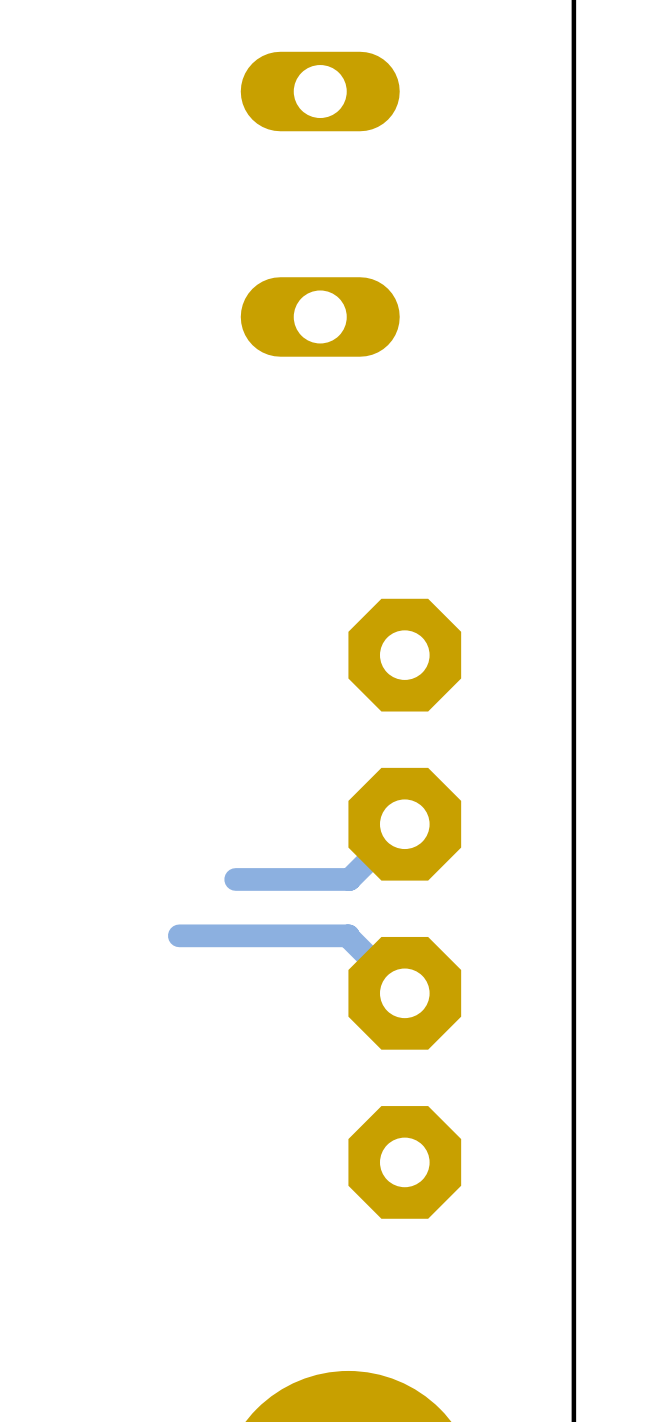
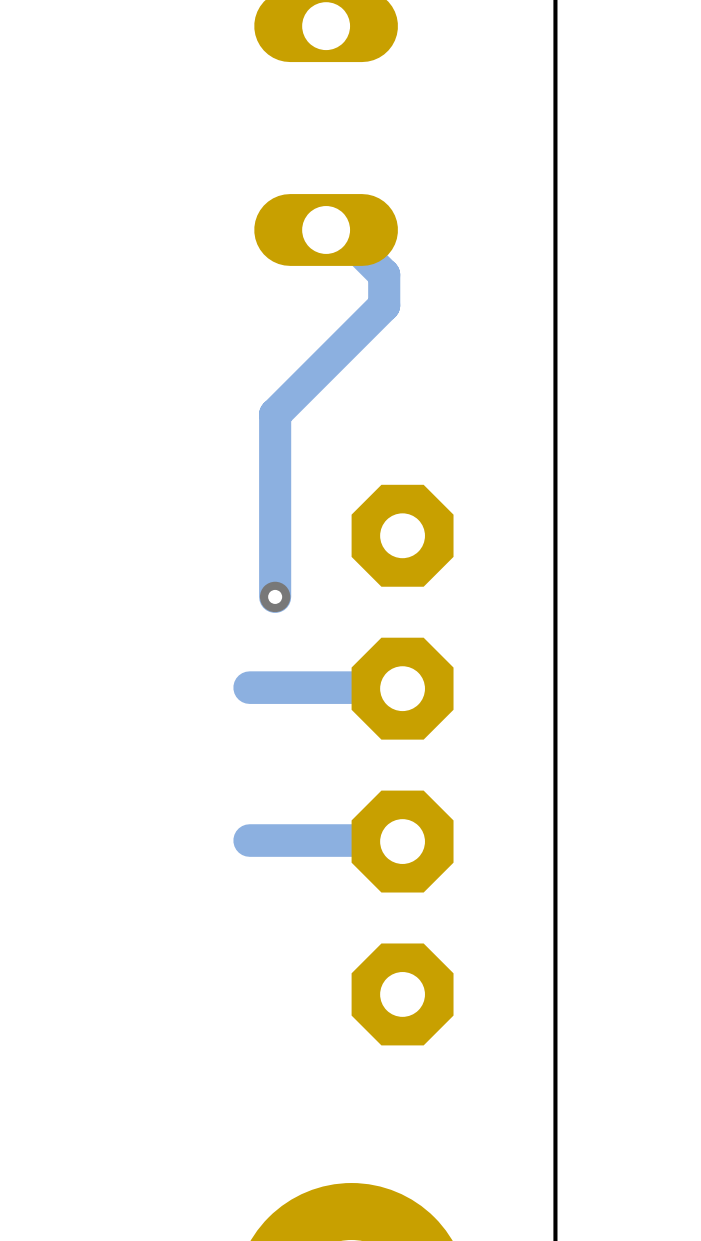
track: none -> (326, 229) (326, 232) (341, 232) (384, 274) (384, 305) (275, 414) (275, 596)
via: none -> (275, 596)
track: (404, 824) (349, 879) (235, 879) -> (402, 688) (249, 687)
track: (179, 935) (348, 935) (404, 993) -> (249, 840) (402, 841)

